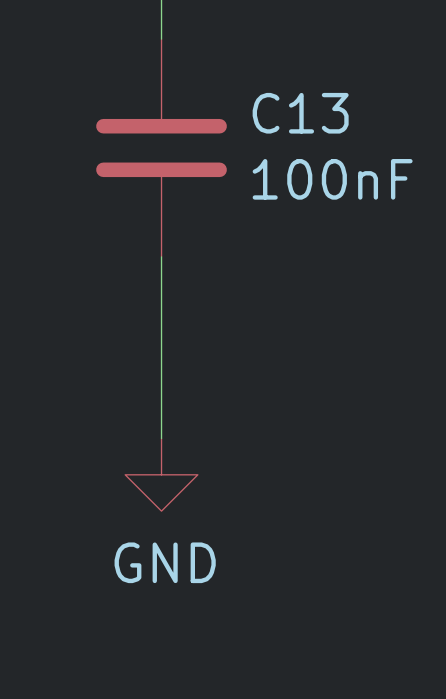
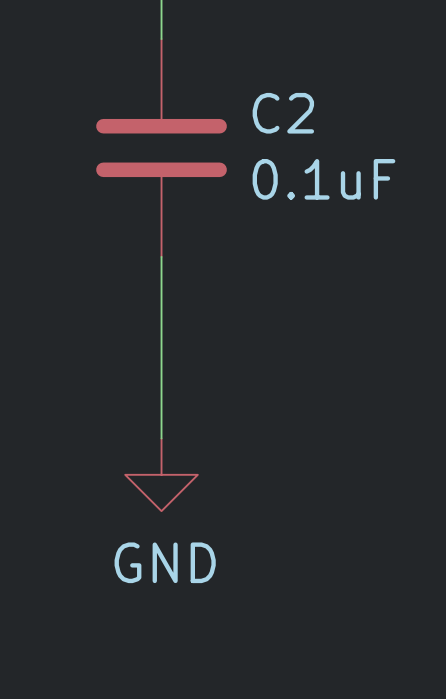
C13 name: C13 (300, 113) -> C2 (283, 113)
C13 value: 100nF (332, 179) -> 0.1uF (323, 179)

